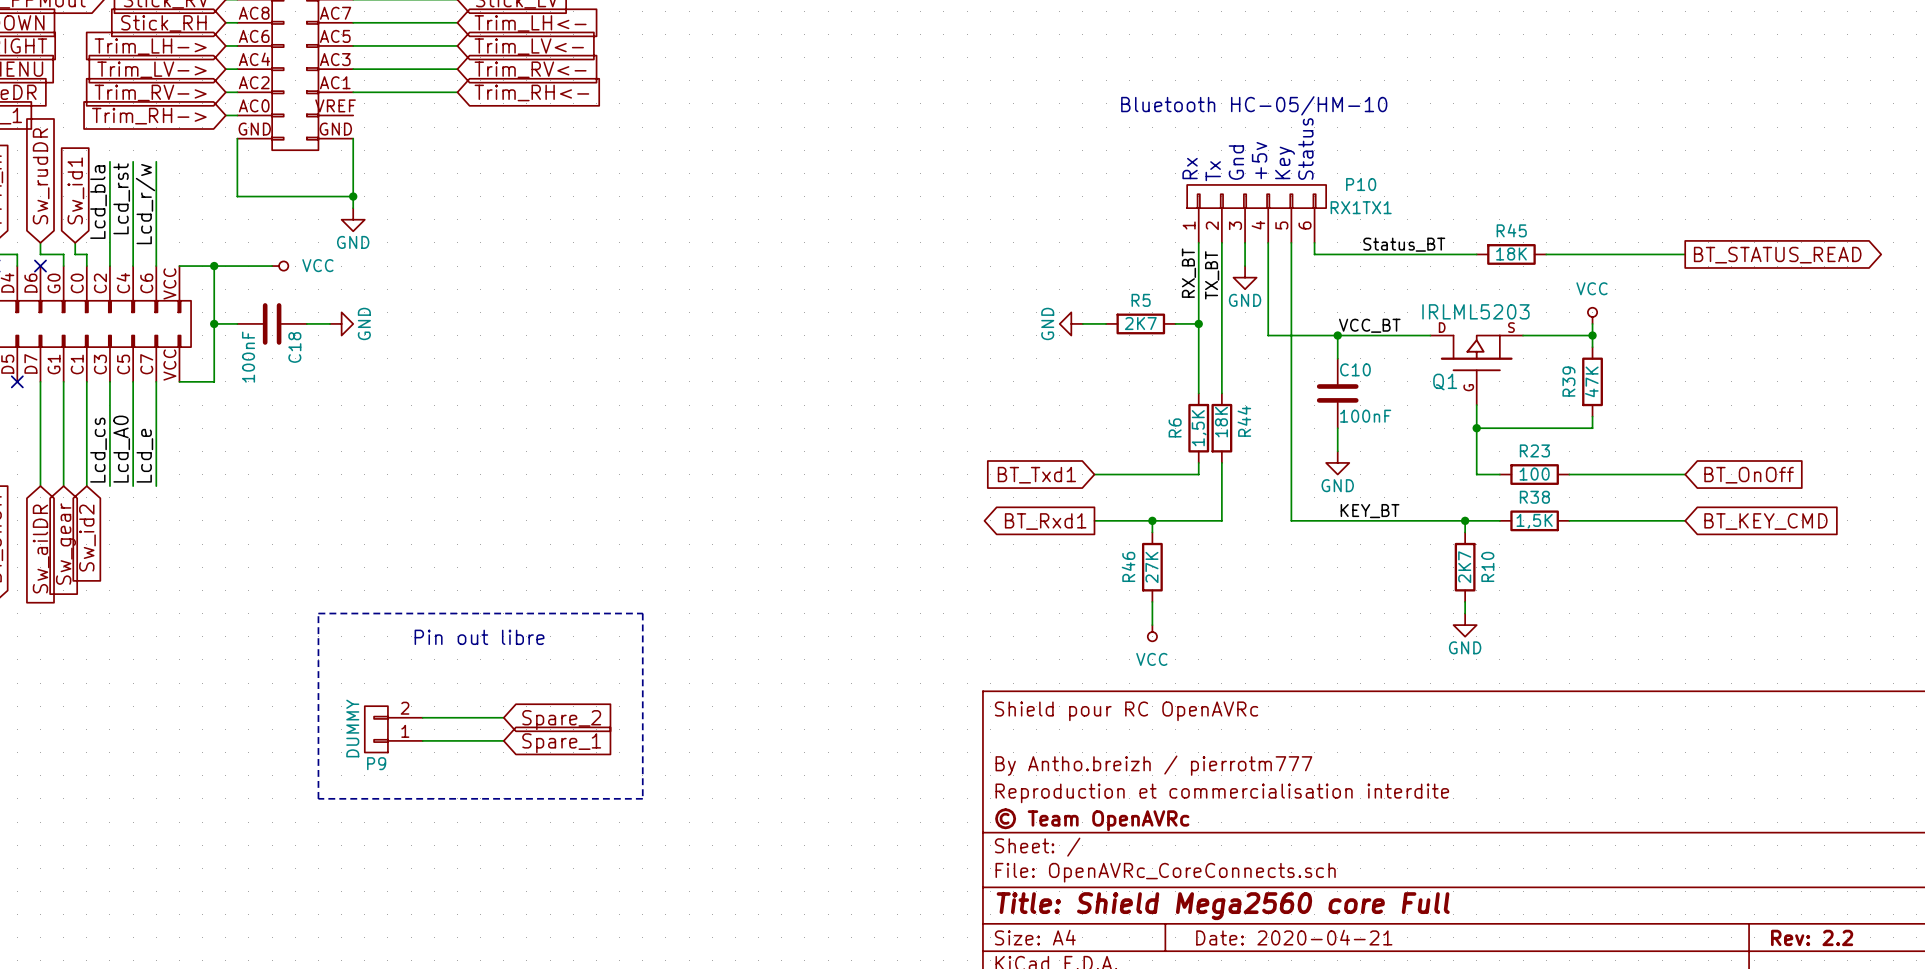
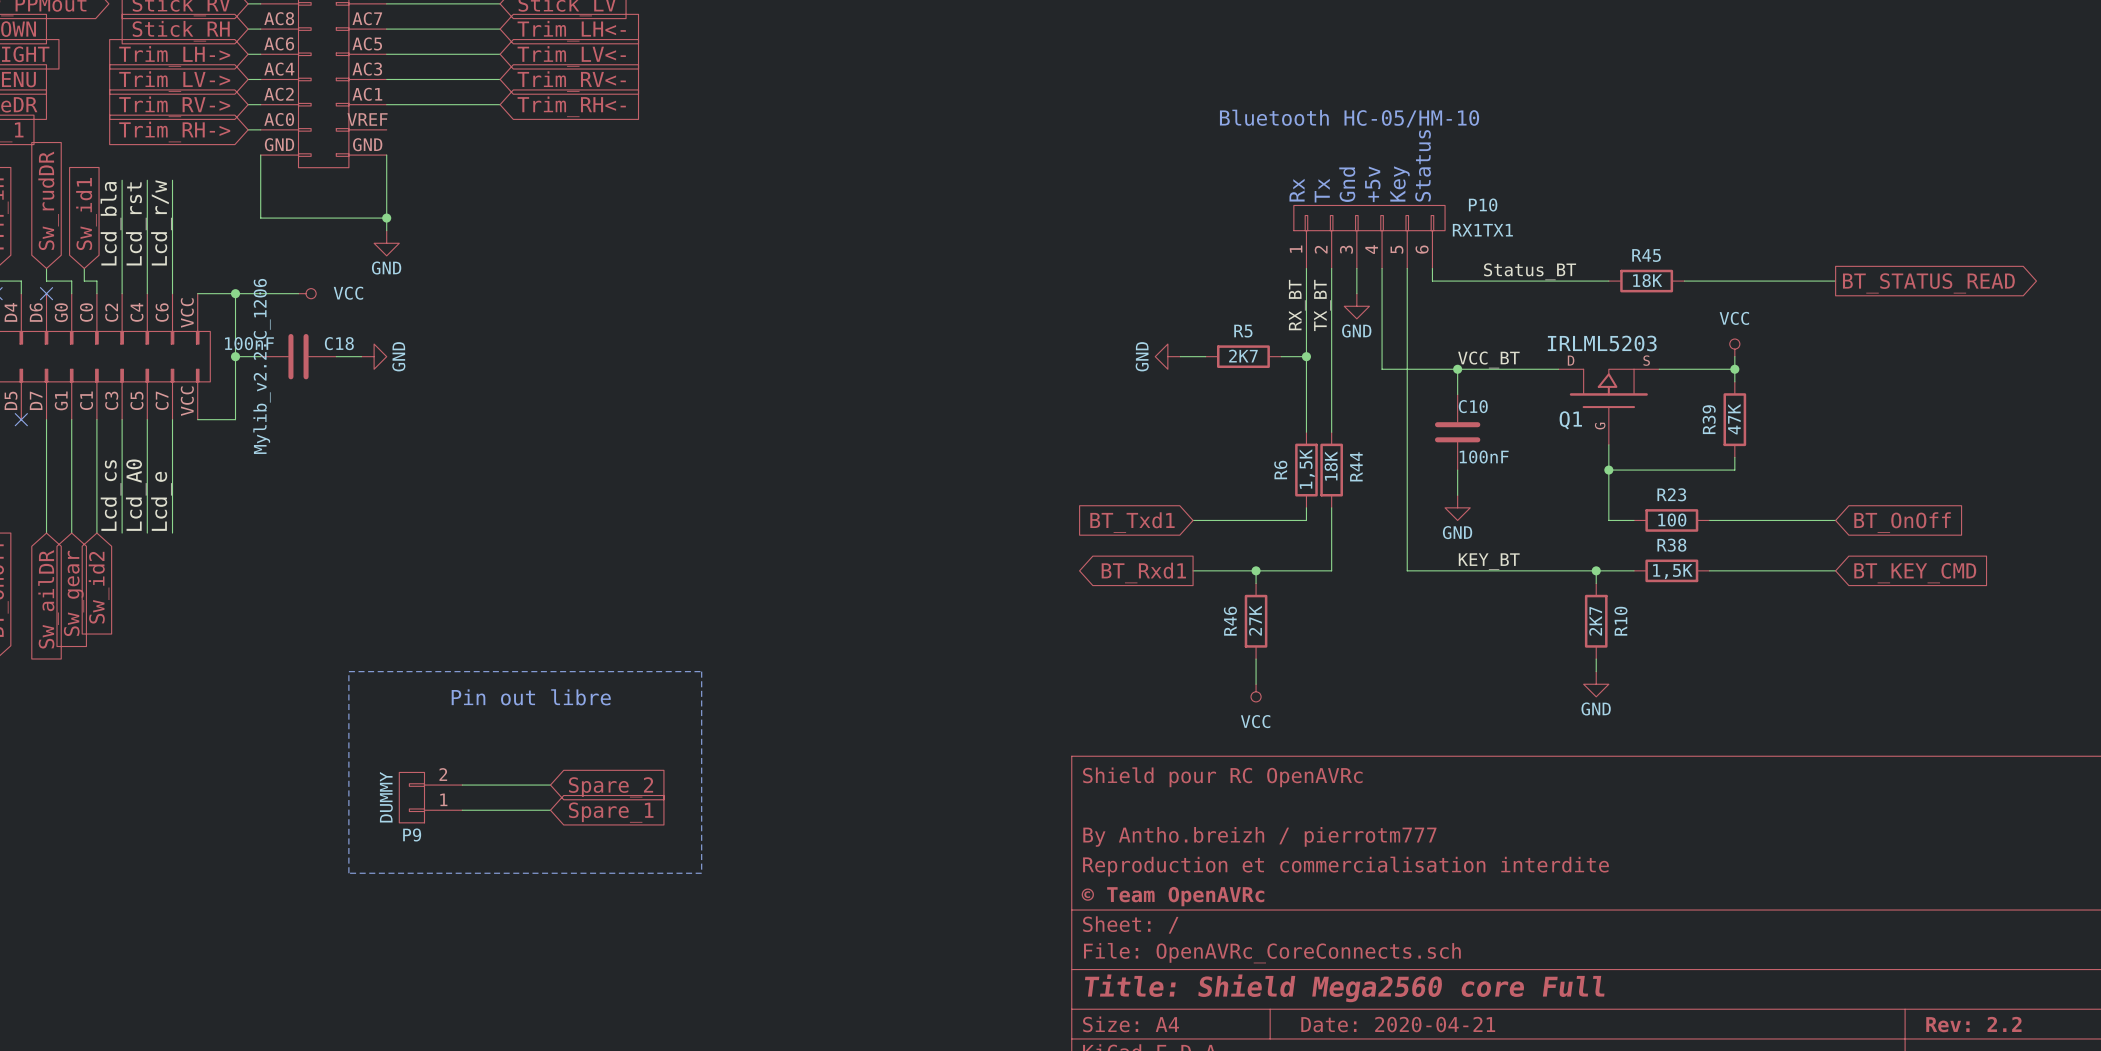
C18 text: none -> Mylib_v2.2:C_1206 (261, 366)
C18 name rotation: 0° (294, 347) -> 90° clockwise (339, 343)
C18 name position: C18 (294, 347) -> C18 (339, 343)
C18 value rotation: 0° (248, 357) -> 90° clockwise (249, 343)

